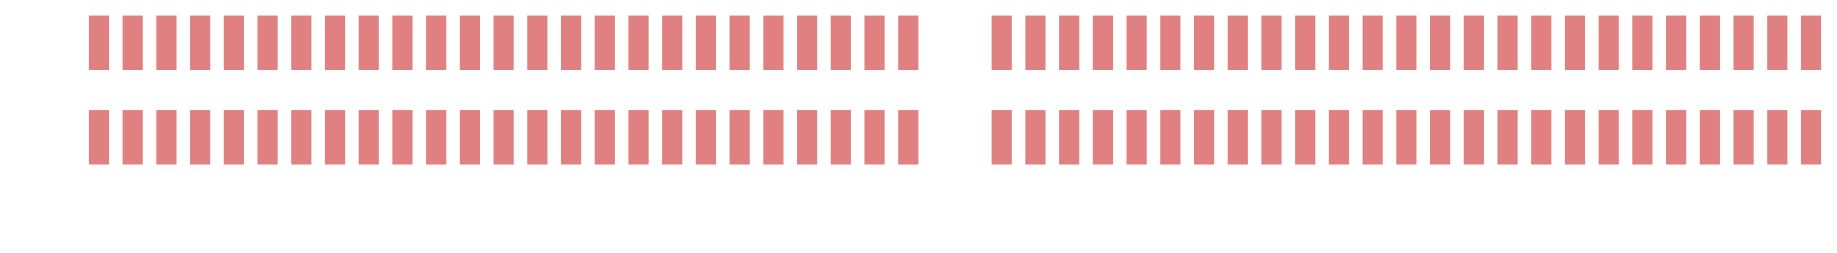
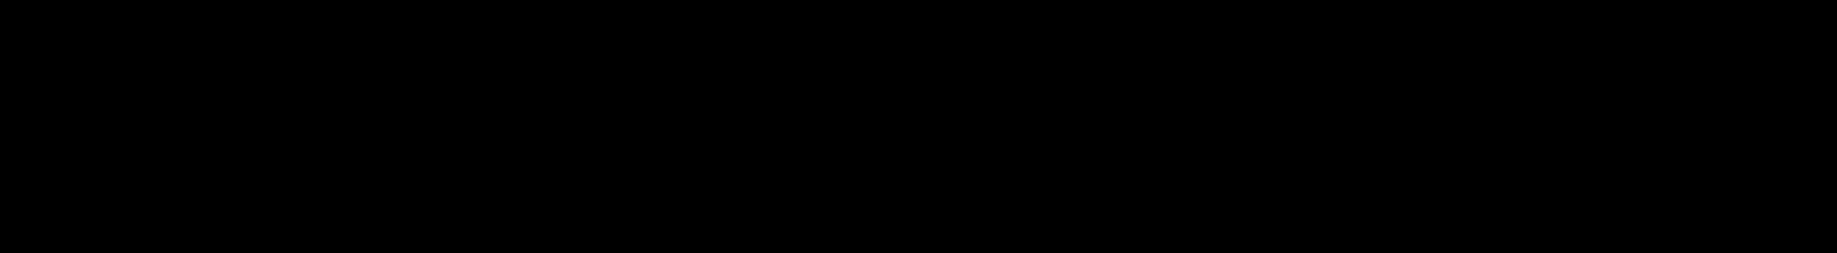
part: (503, 90) -> none
part: (1406, 90) -> none

